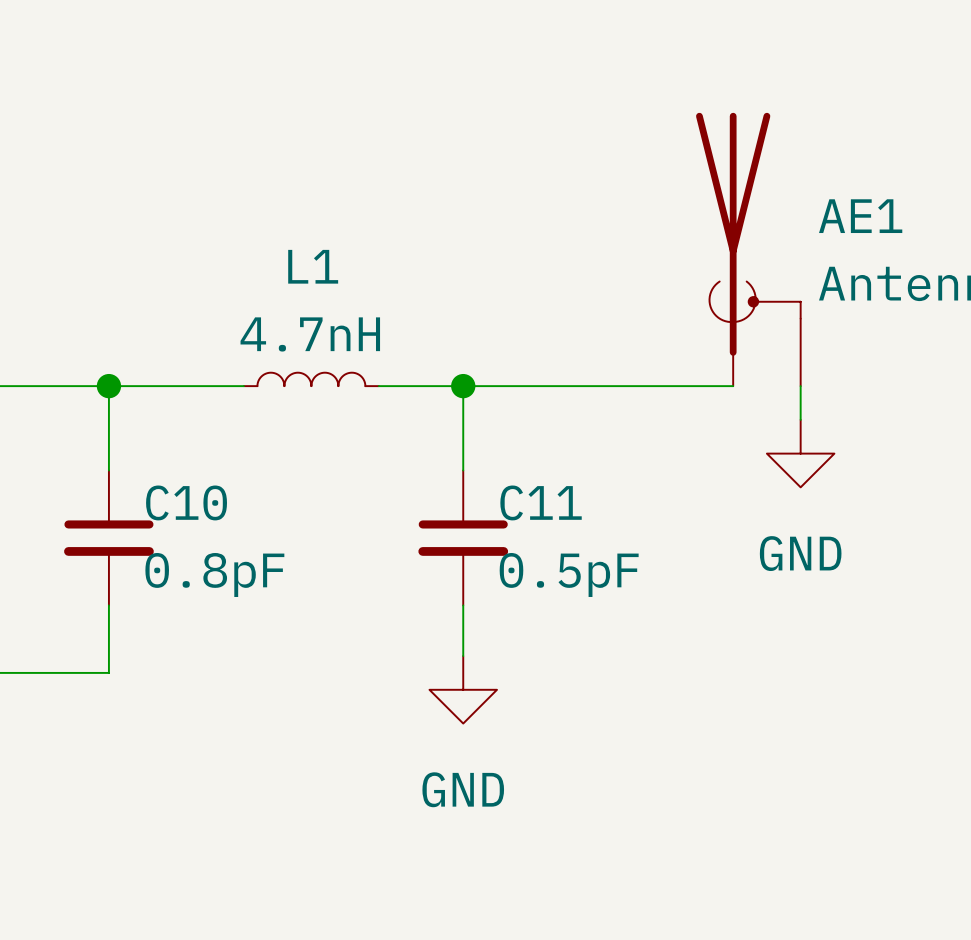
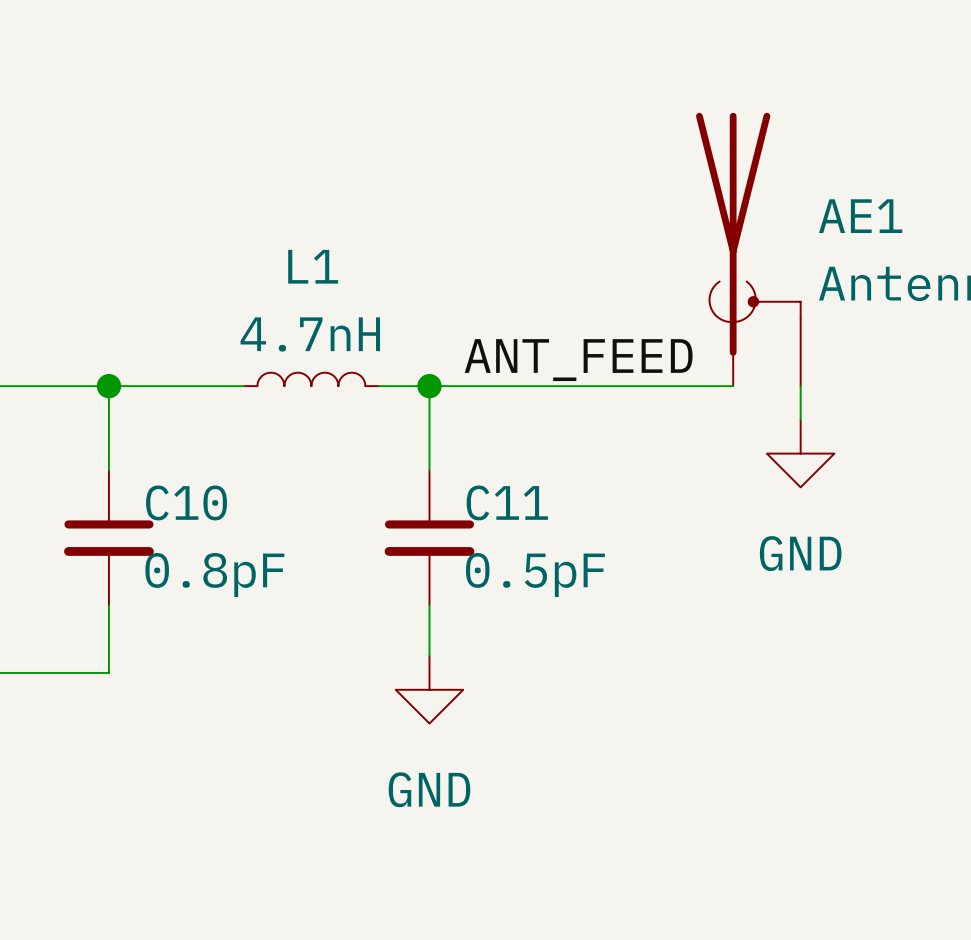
label: none -> ANT_FEED (578, 360)
wire: (463, 386) (463, 470) -> (429, 386) (429, 470)
junction position: (463, 386) -> (429, 386)
C11 position: (463, 537) -> (429, 537)
wire: (463, 605) (463, 656) -> (429, 605) (429, 656)
power symbol position: GND (463, 689) -> GND (429, 689)

